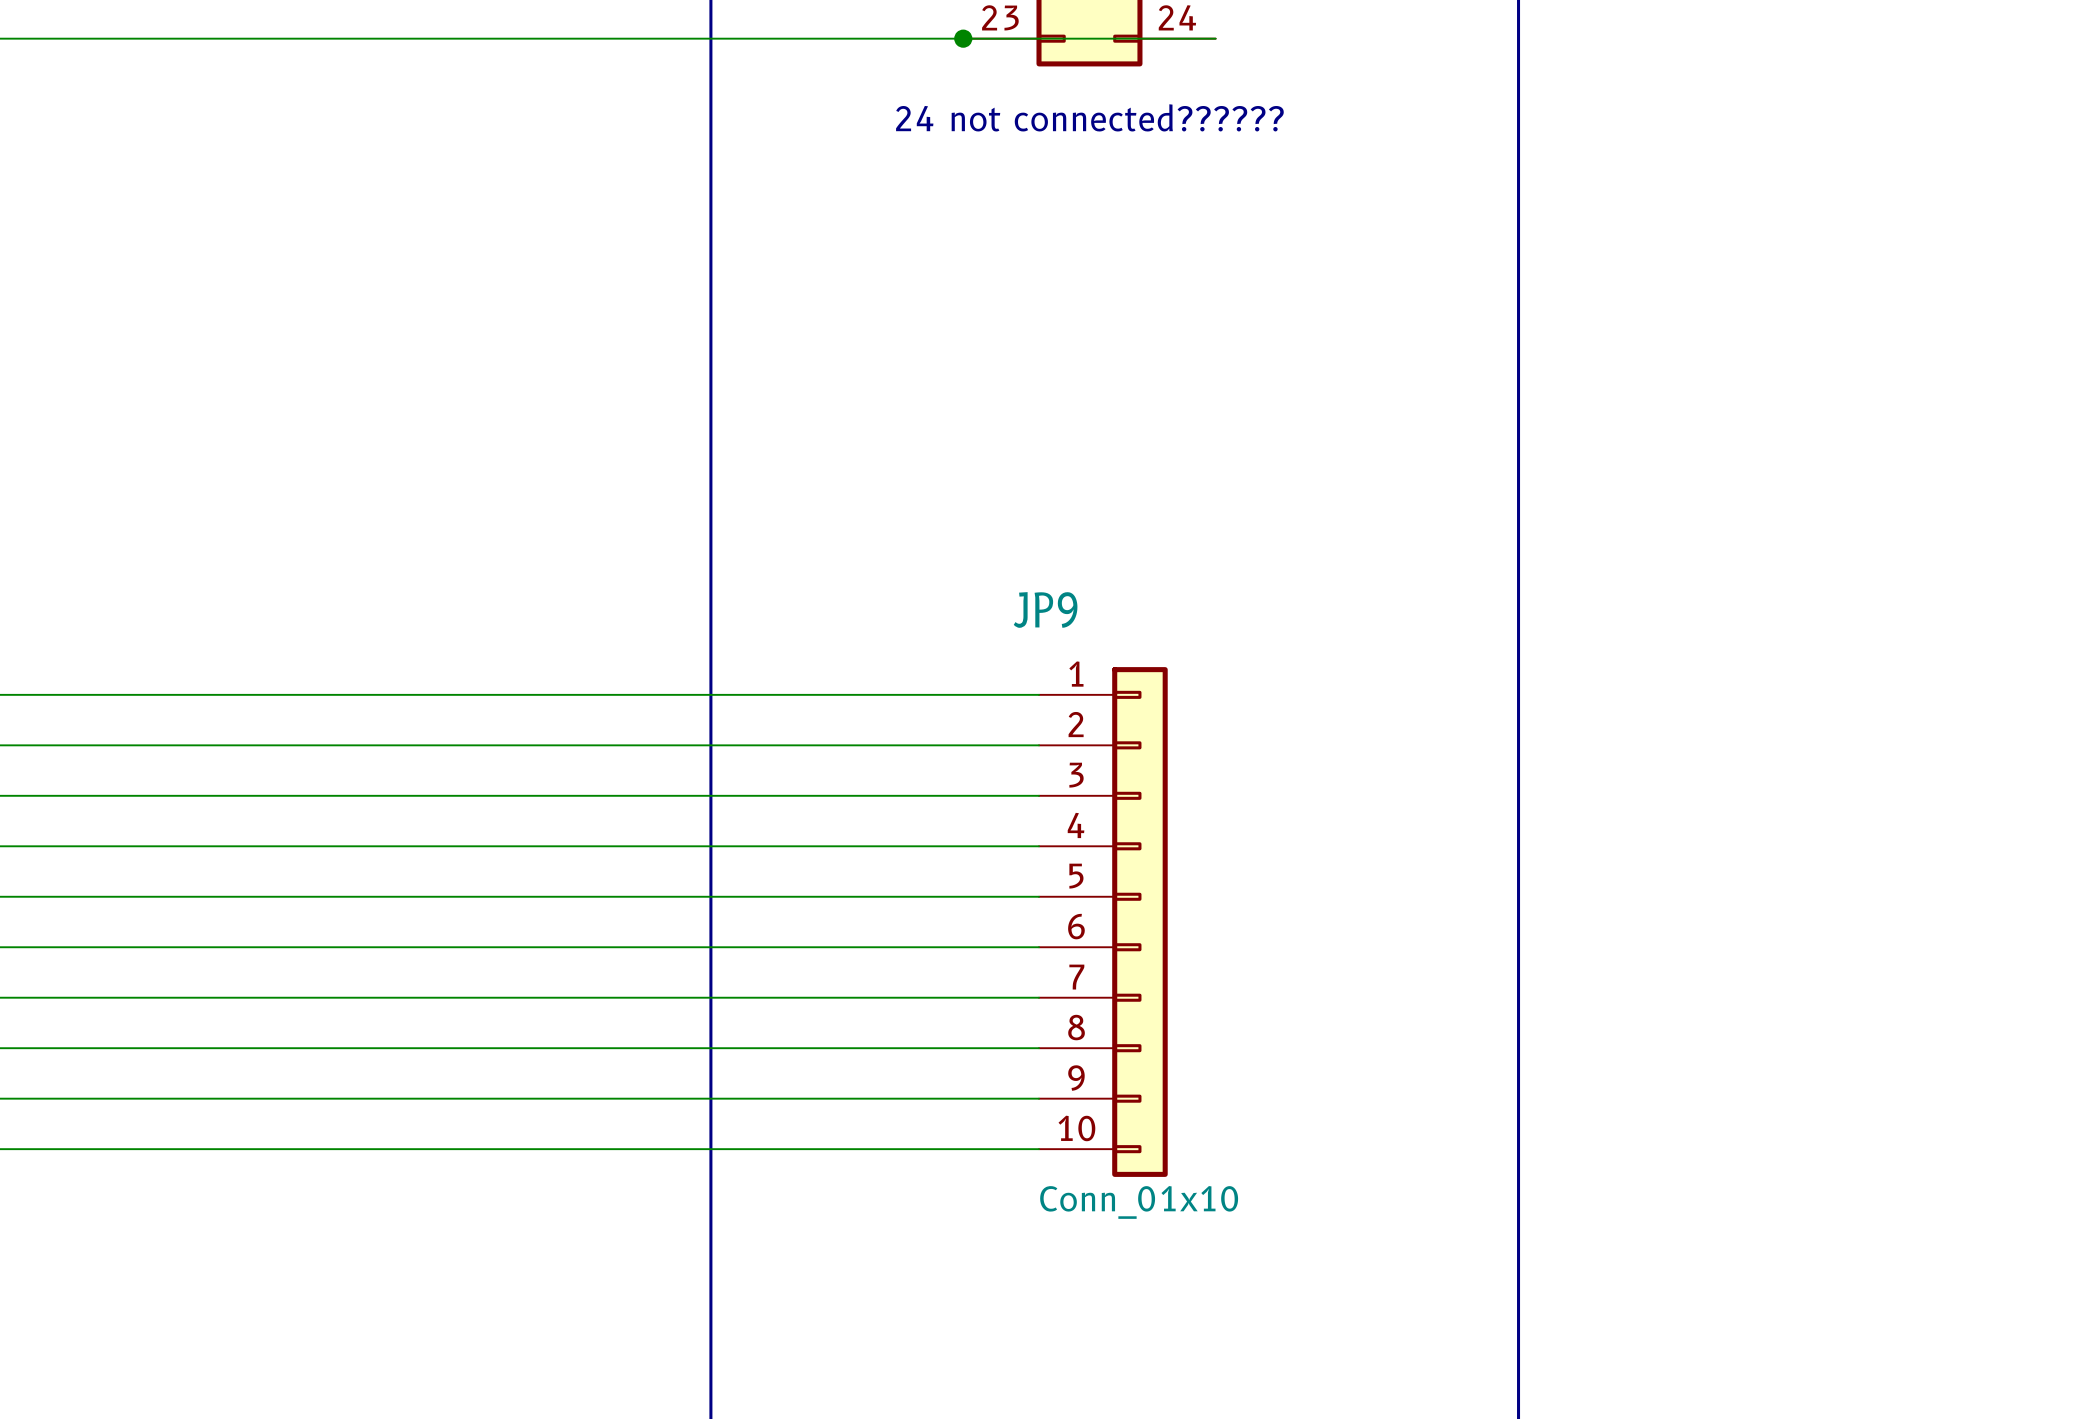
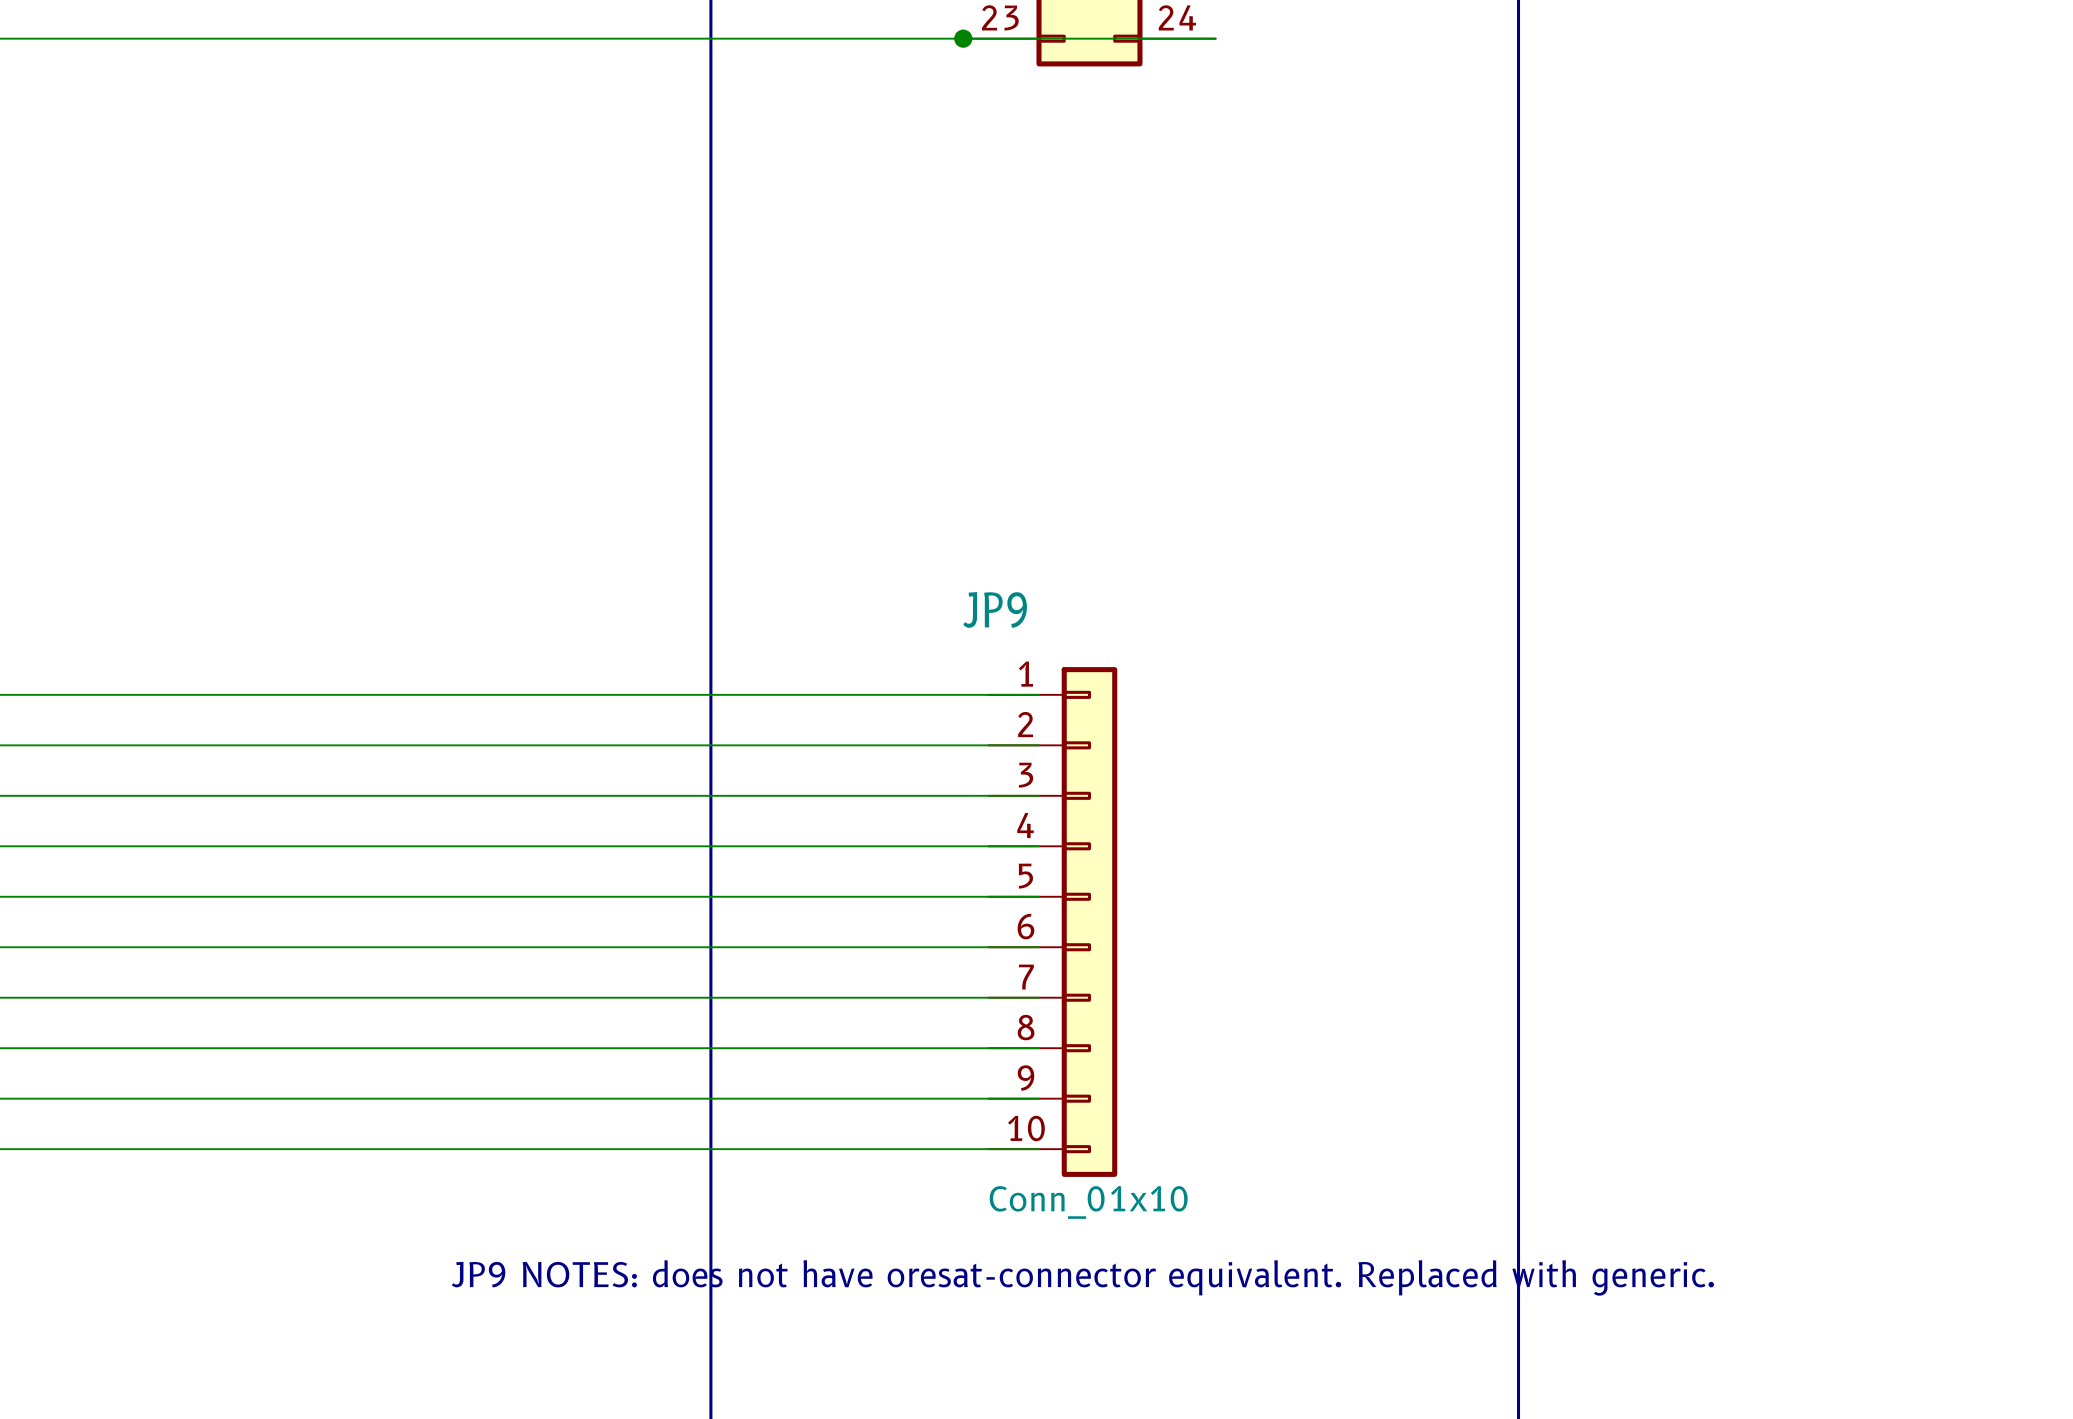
text: 24 not connected?????? (1089, 117) -> none
JP9 position: (1103, 922) -> (1052, 922)
text: none -> JP9 NOTES: does not have oresat-connector equivalent. Replaced with generic. (1082, 1277)

